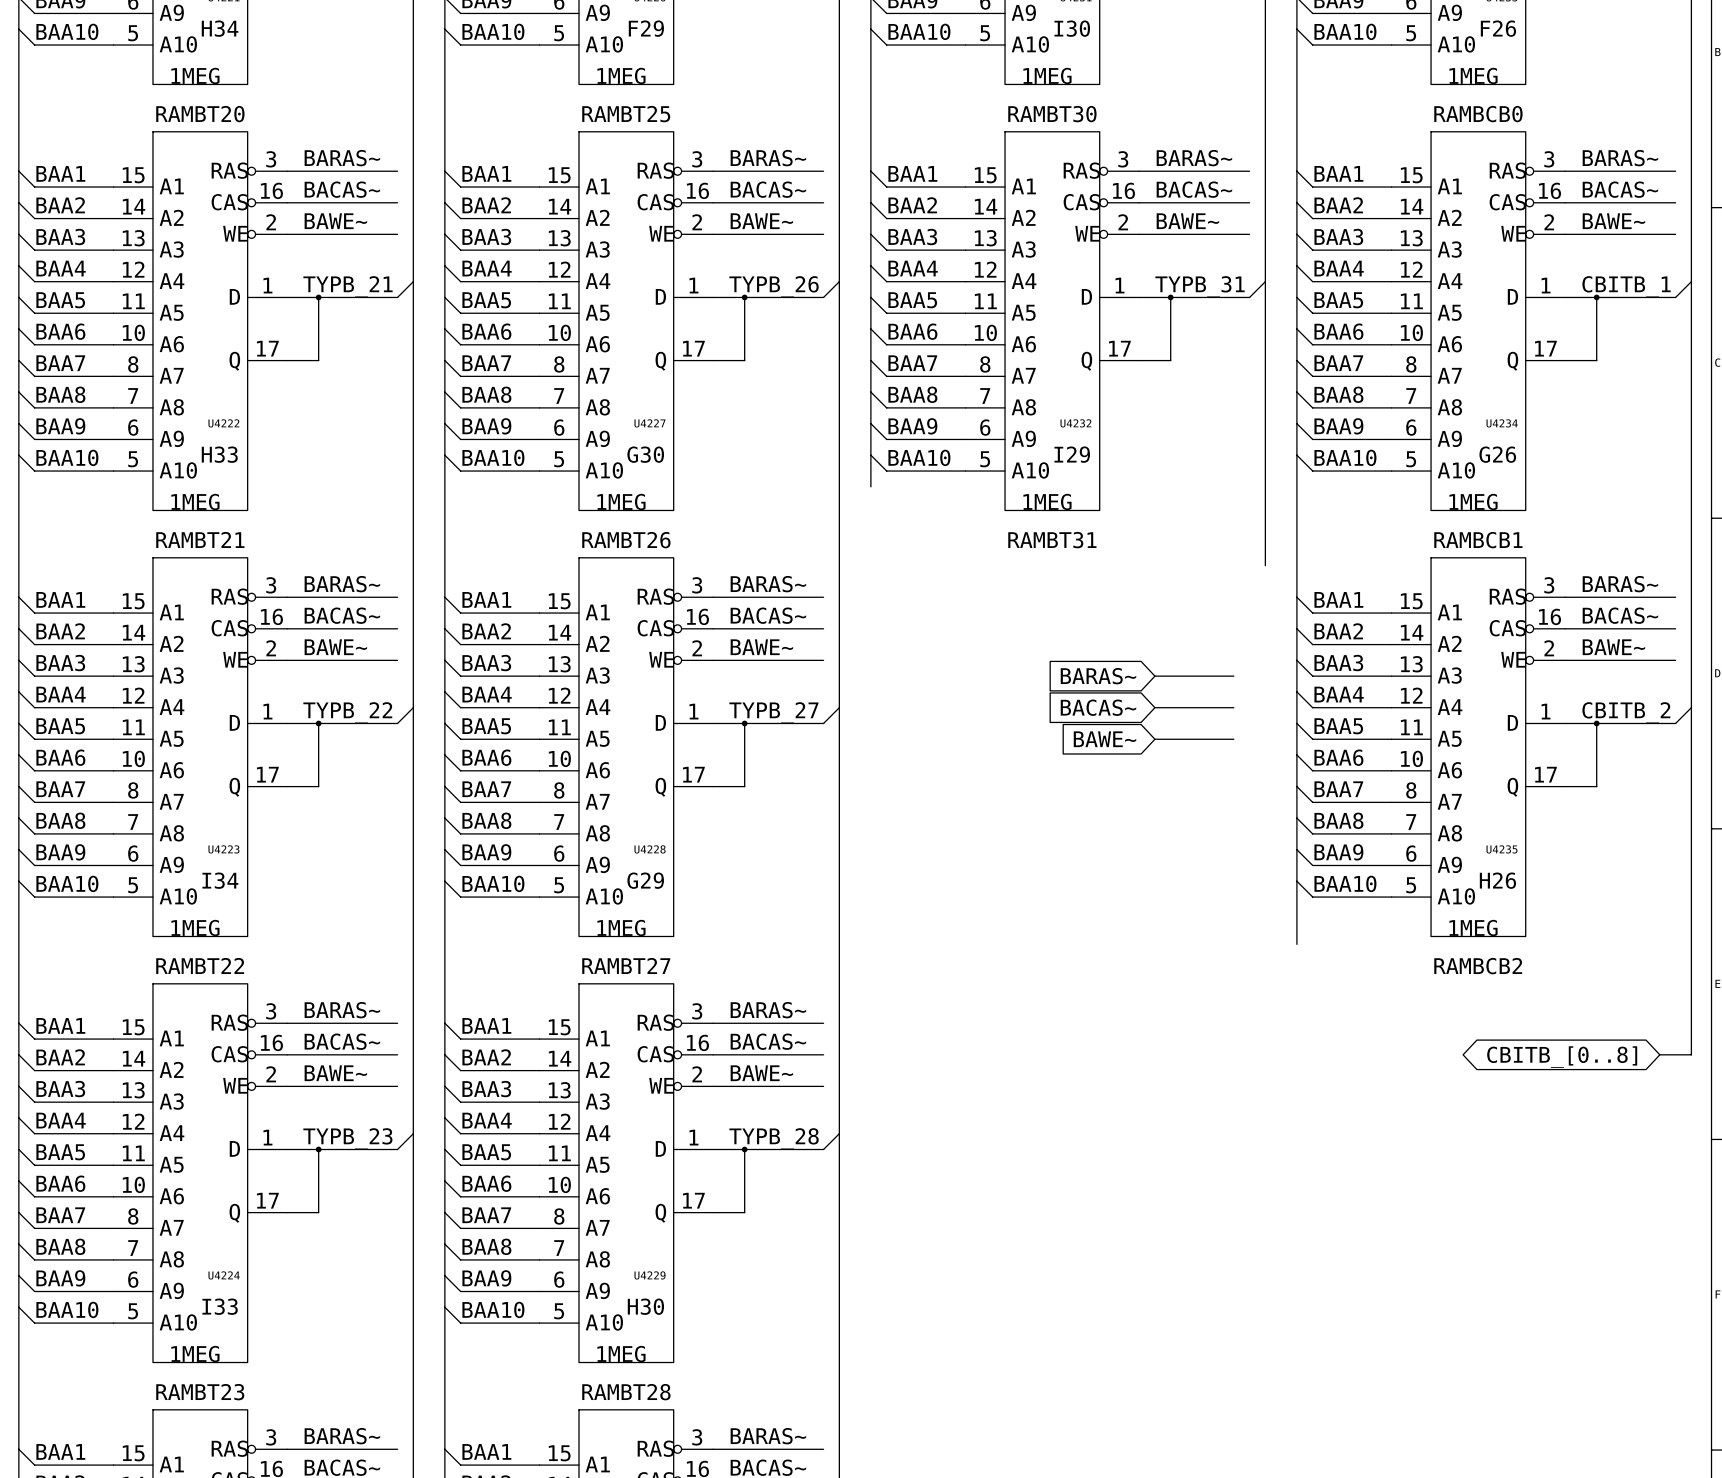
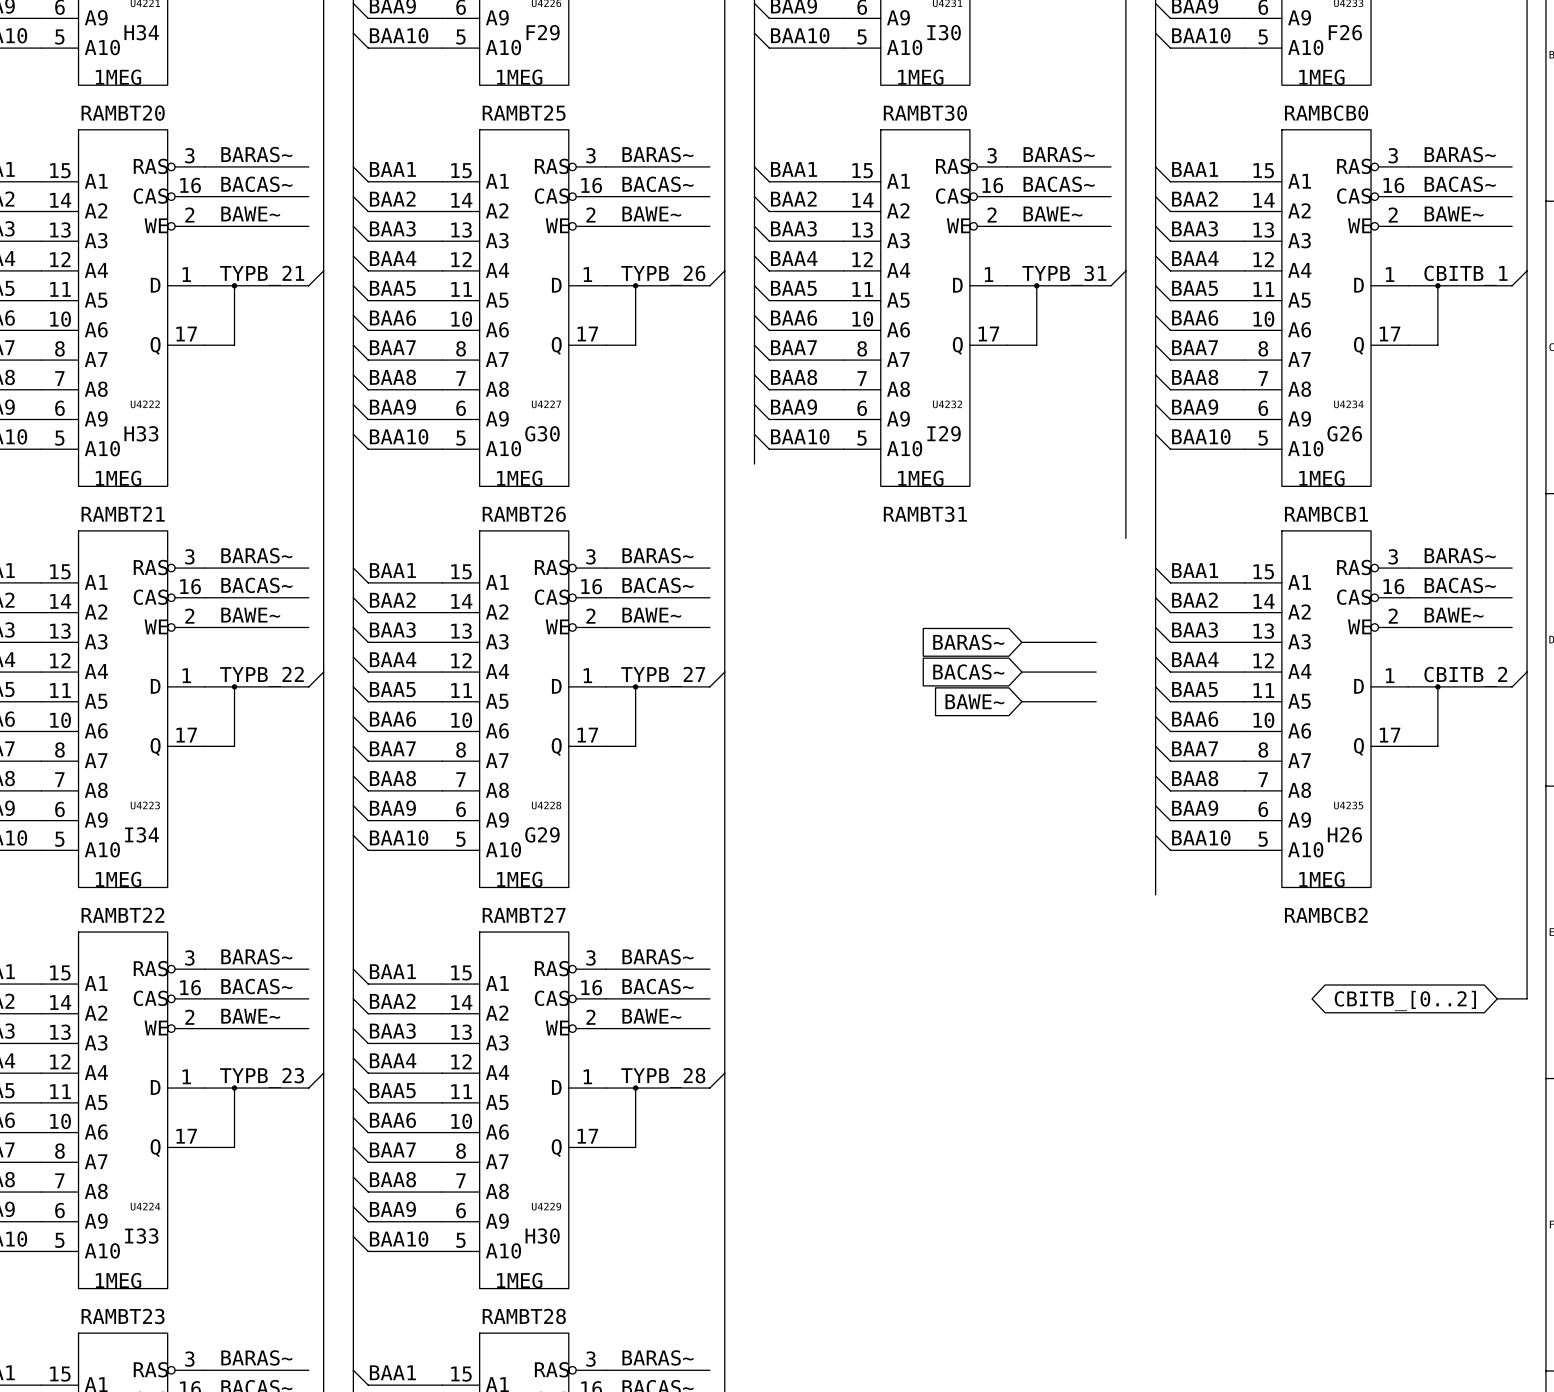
global label: CBITB_[0..8] (1562, 1057) -> CBITB_[0..2] (1405, 1000)

